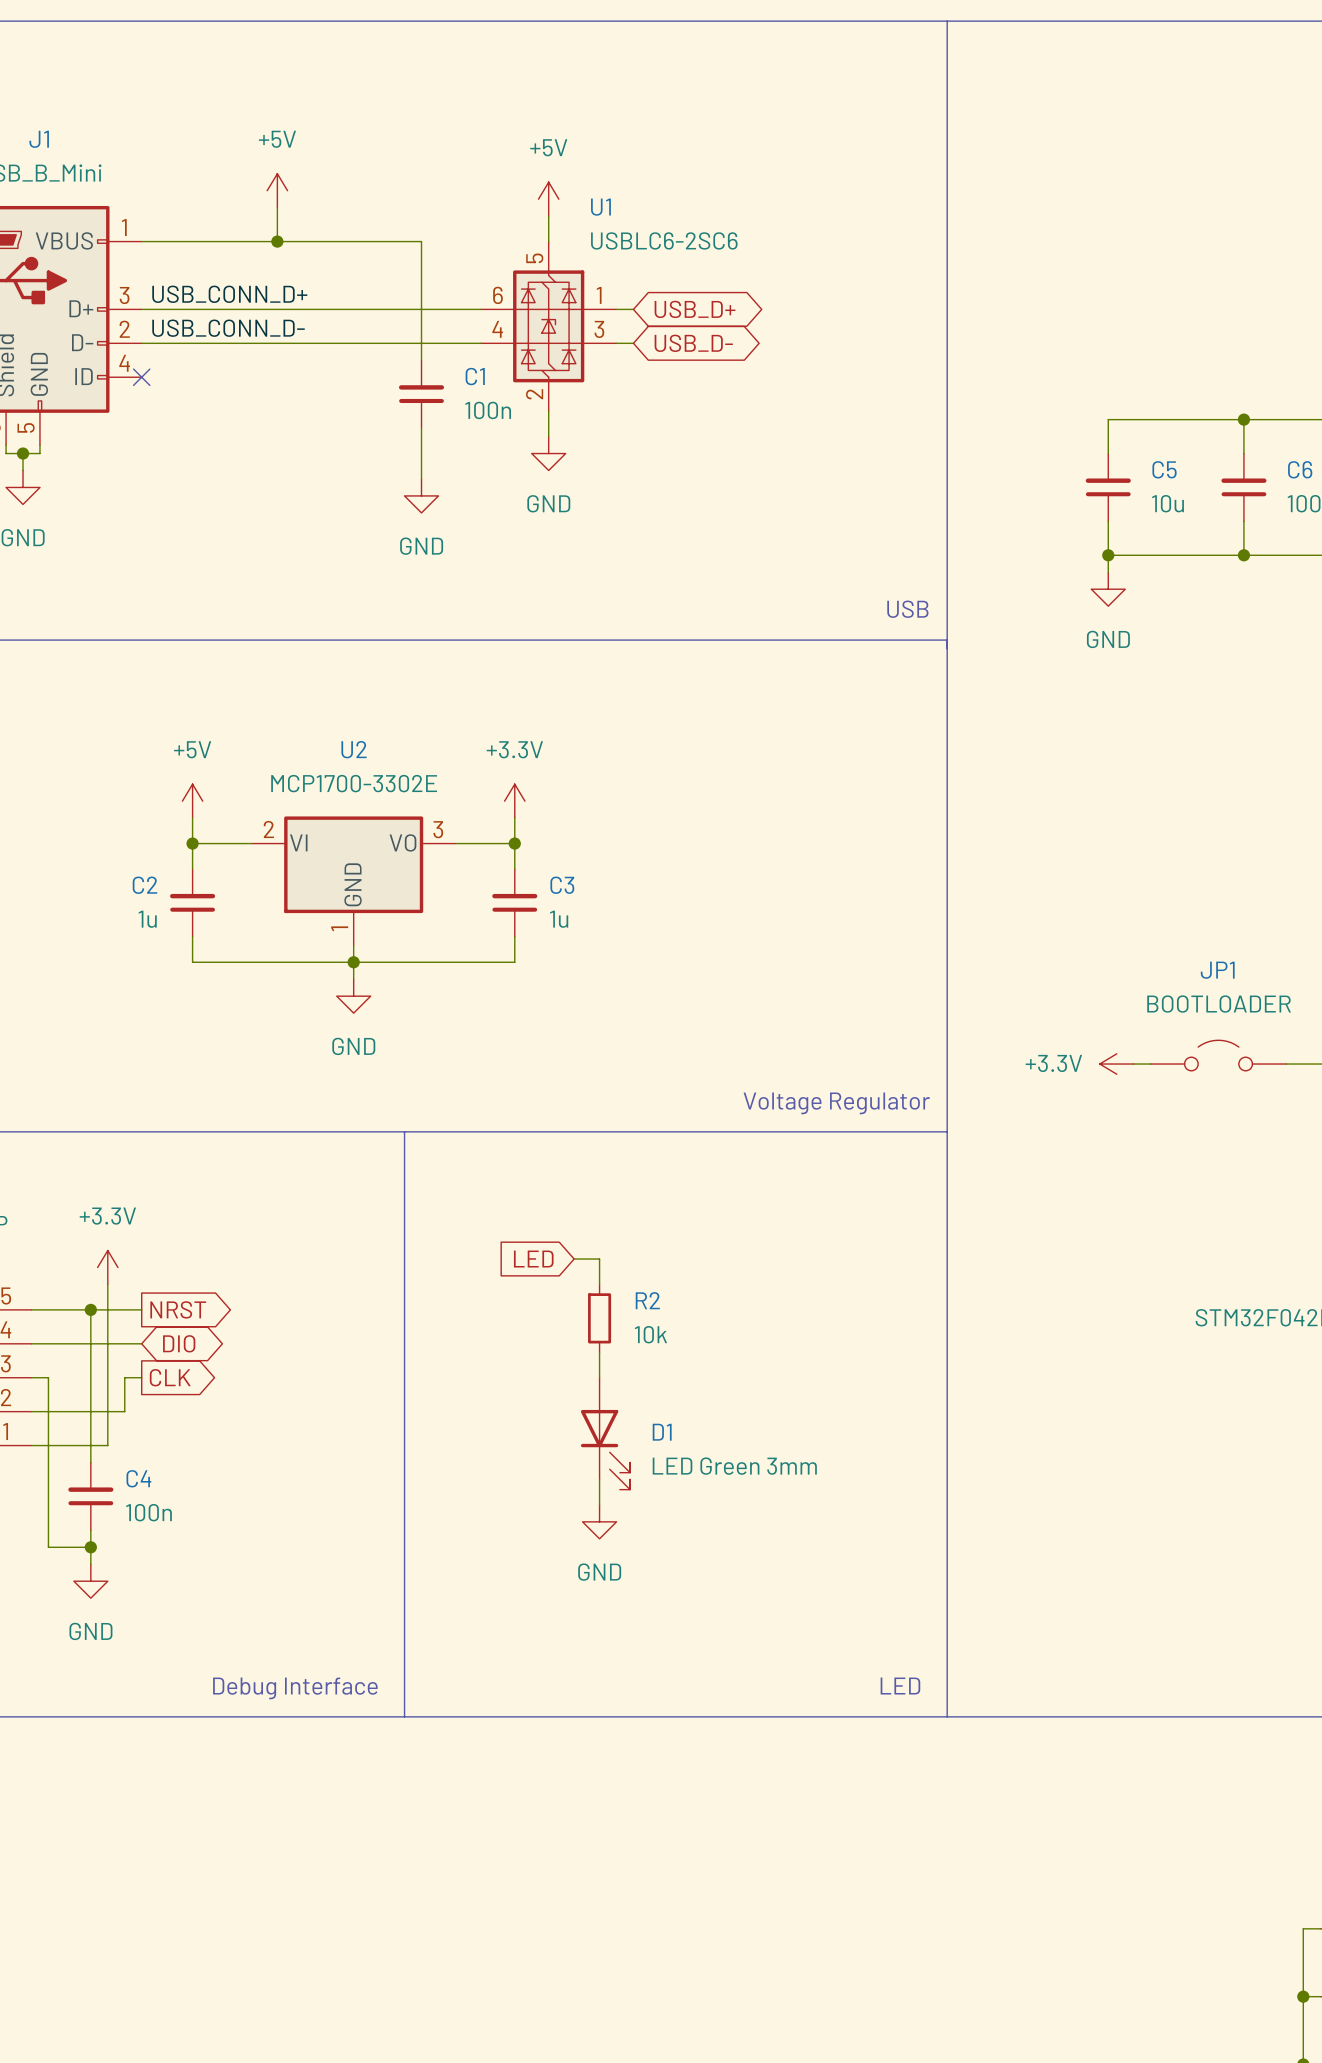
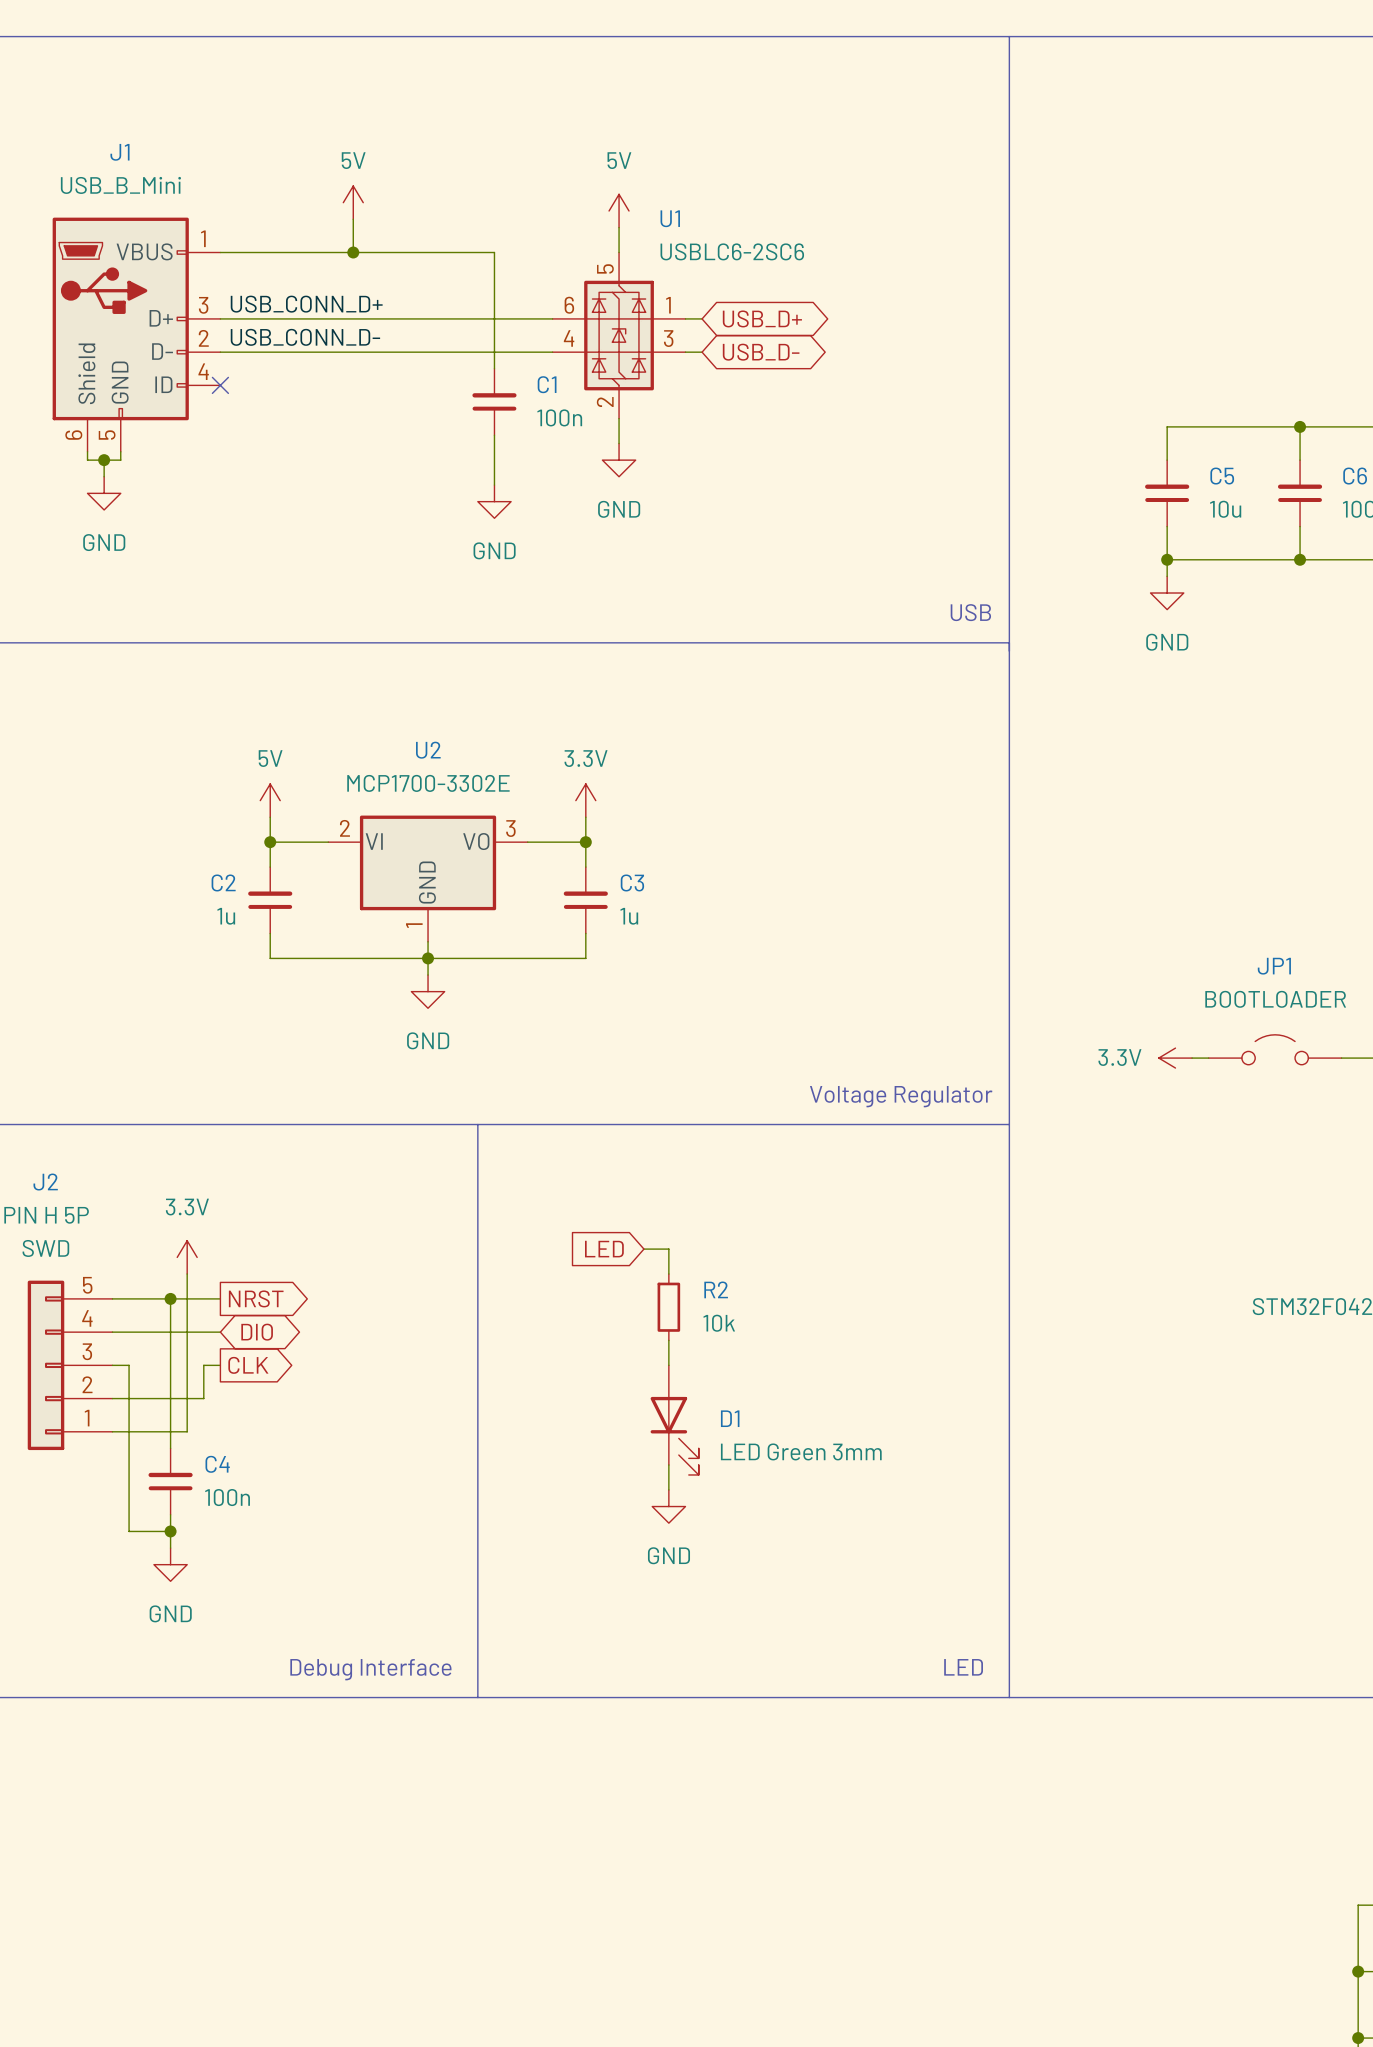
power symbol: +5V (277, 190) -> 5V (353, 202)
power symbol: +5V (548, 199) -> 5V (619, 210)
power symbol: +5V (192, 801) -> 5V (270, 800)
power symbol: +3.3V (514, 801) -> 3.3V (585, 800)
power symbol: +3.3V (1116, 1064) -> 3.3V (1175, 1058)
power symbol: +3.3V (107, 1267) -> 3.3V (187, 1257)

